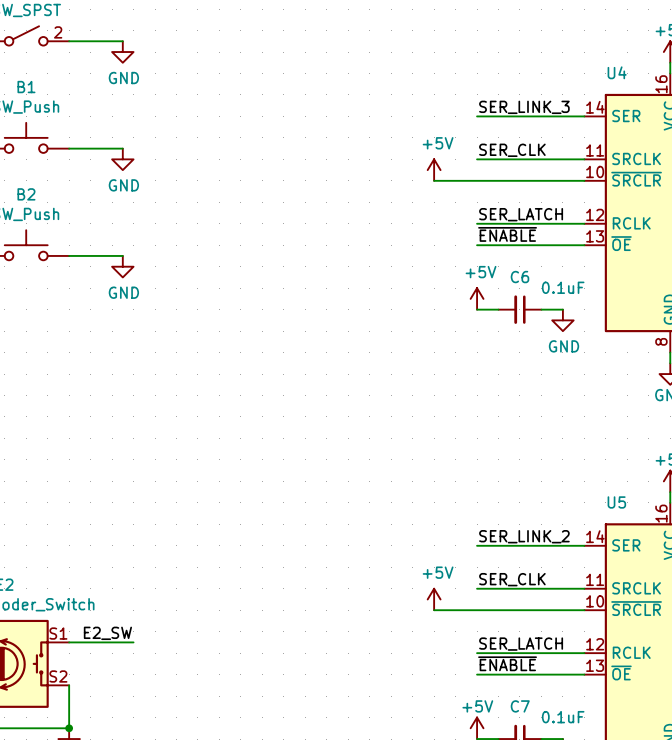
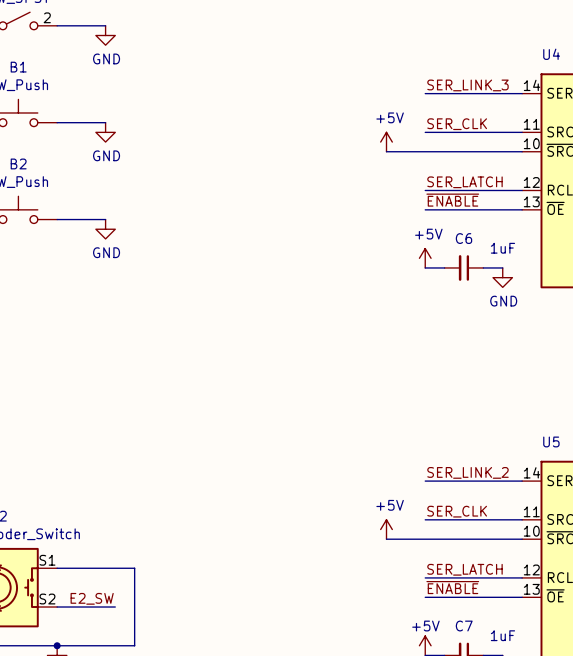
C6 value: 0.1uF (563, 287) -> 1uF (502, 248)
label position: E2_SW (107, 633) -> E2_SW (92, 598)
wire: none -> (115, 568) (134, 568) (134, 645) (57, 645)
wire: (69, 685) (69, 728) -> (57, 607) (115, 607)
C7 value: 0.1uF (563, 717) -> 1uF (502, 635)

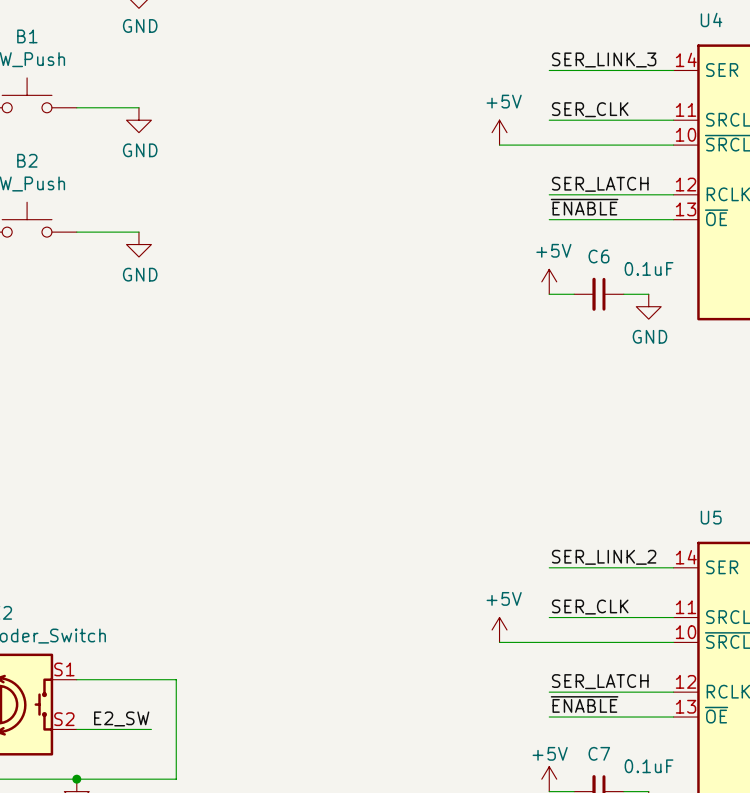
C6 value: 1uF (502, 248) -> 0.1uF (649, 268)
C7 value: 1uF (502, 635) -> 0.1uF (649, 766)

